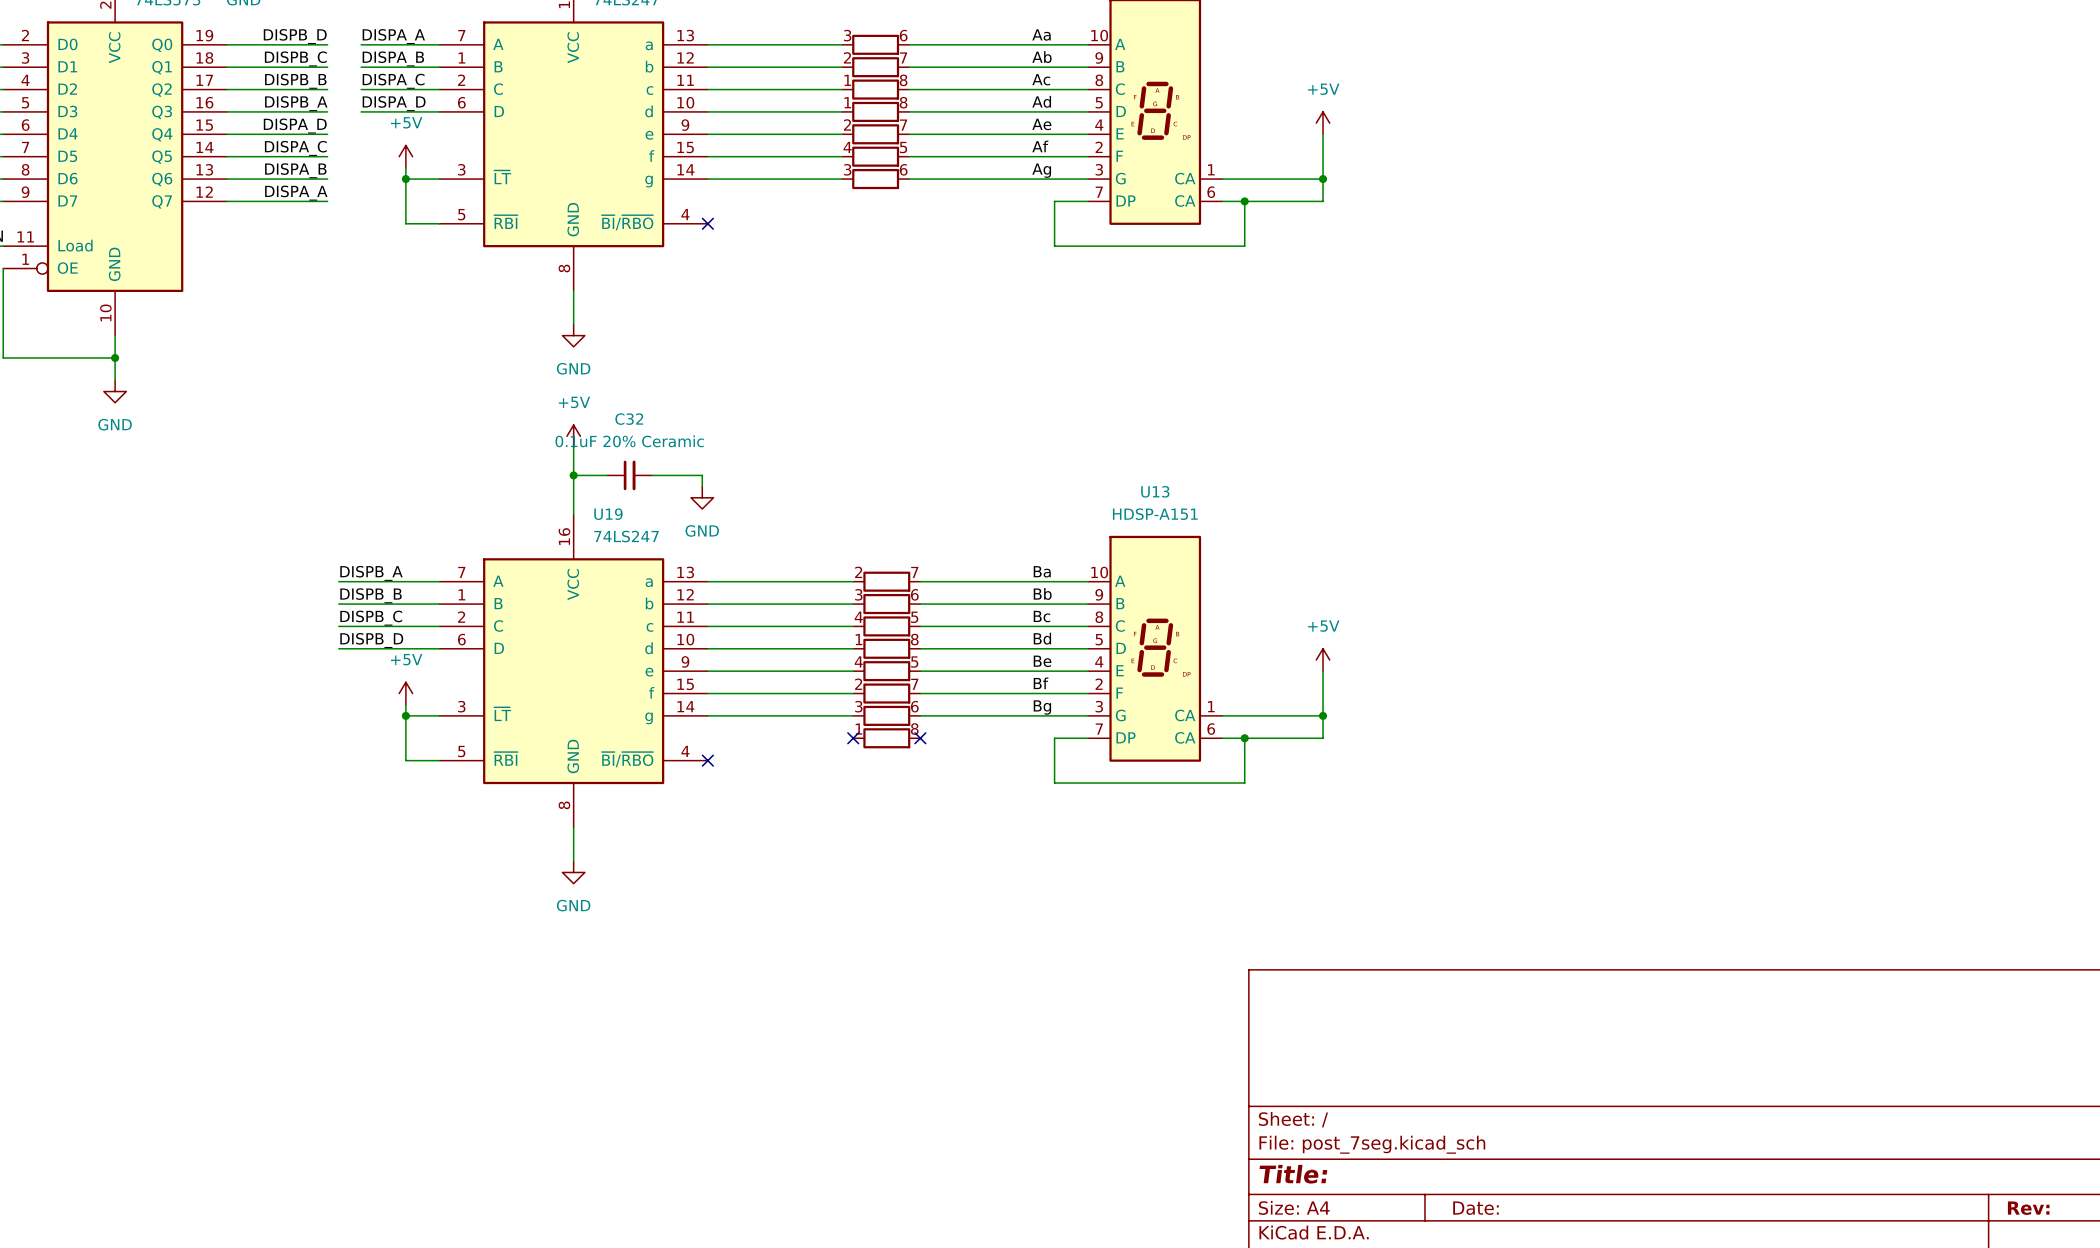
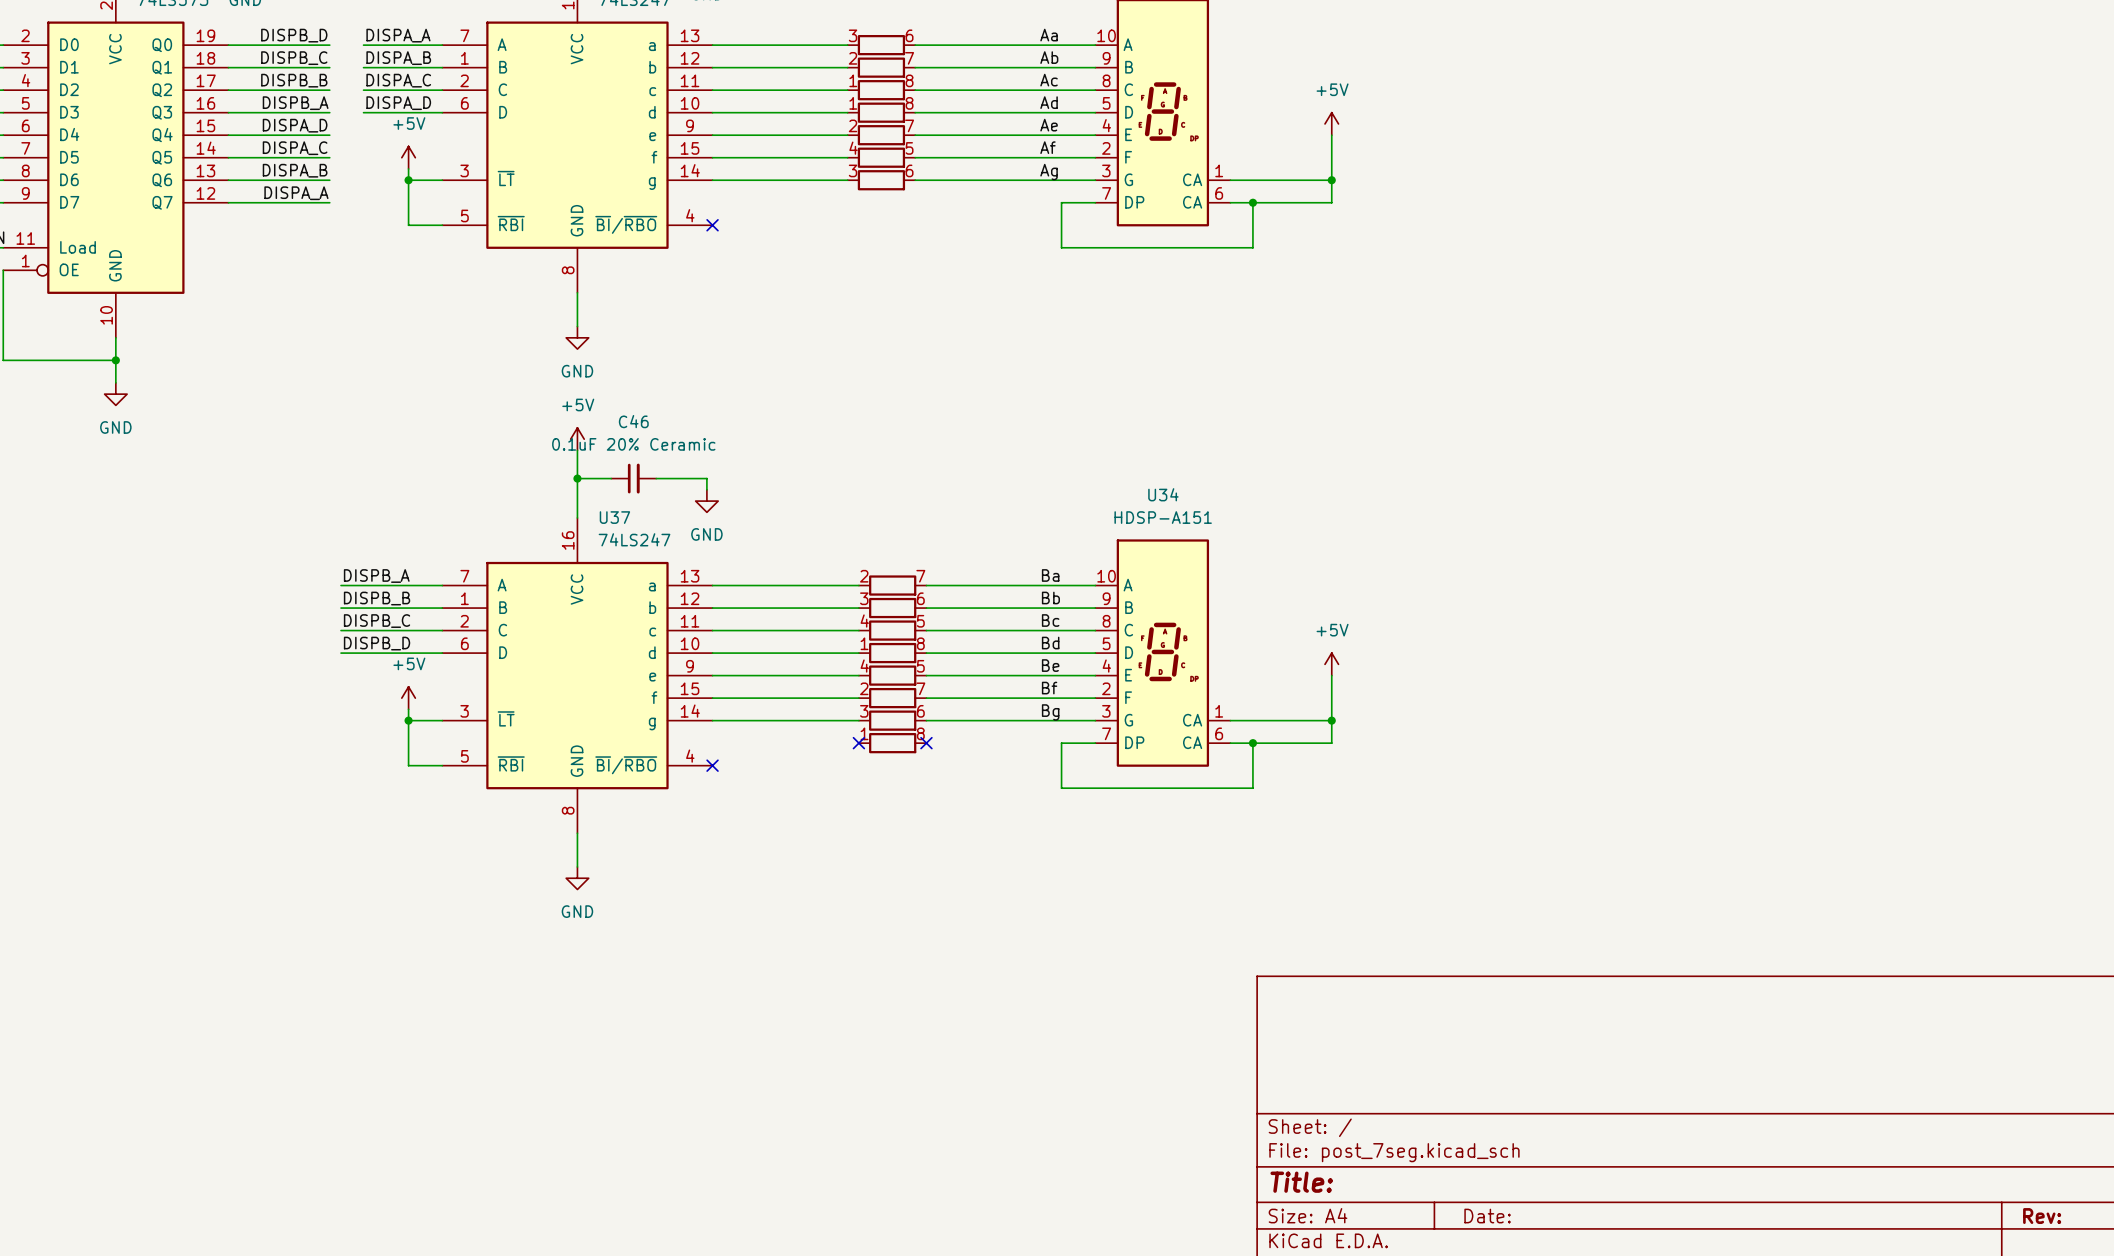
C32 name: C32 (629, 419) -> C46 (633, 421)
U13 name: U13 (1155, 491) -> U34 (1163, 494)
U19 name: U19 (608, 514) -> U37 (614, 517)

